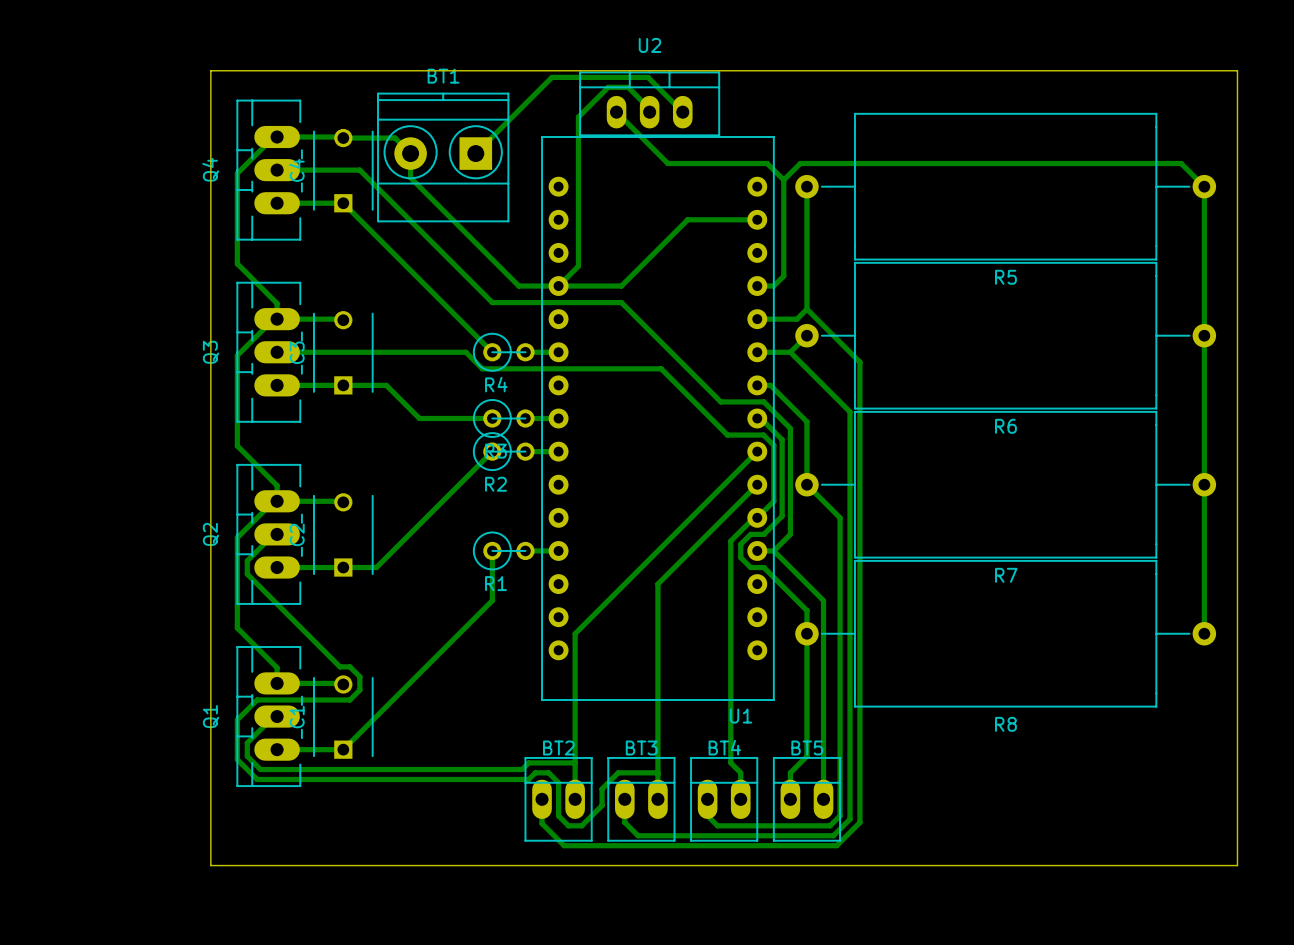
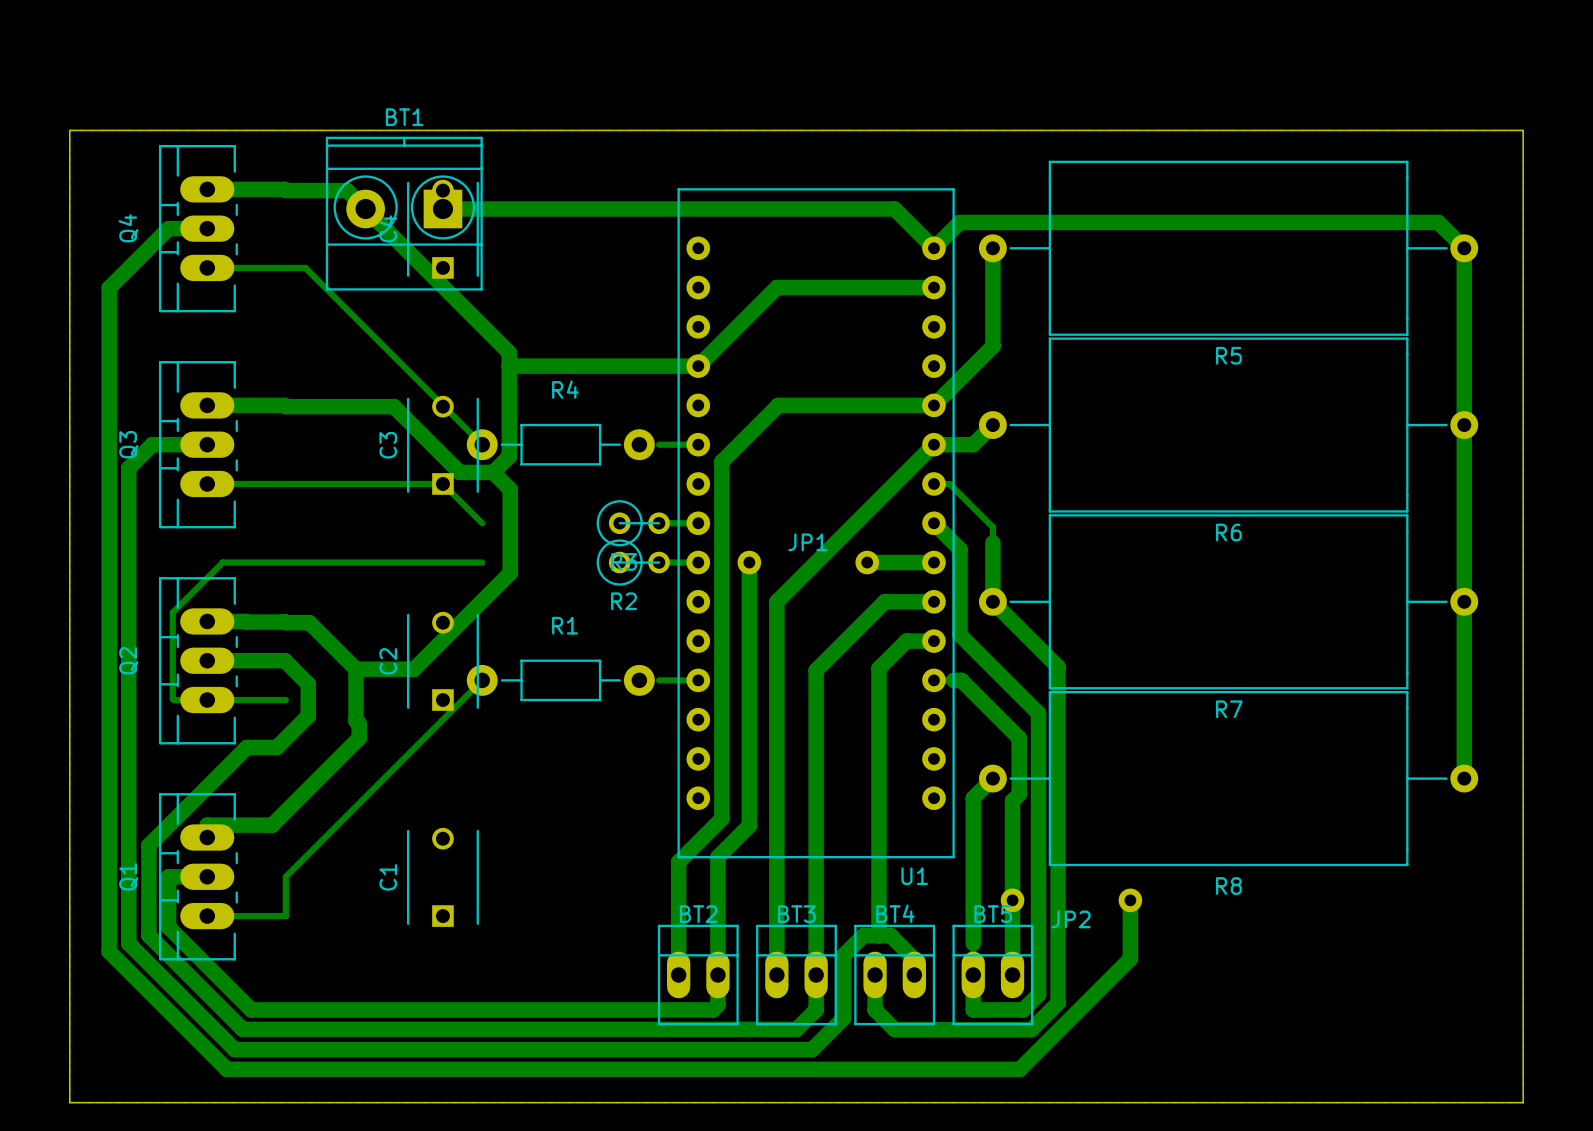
board edge: (210, 70) (210, 865) (1237, 865) (1237, 70) (210, 70) -> (69, 130) (69, 1102) (1523, 1102) (1523, 130) (69, 130)
U2: (649, 103) -> none
bottom track: (616, 112) (667, 163) (767, 163) (783, 180) -> none
bottom track: (649, 112) (649, 108) (628, 87) (608, 87) (578, 117) (578, 266) -> none
bottom track: (682, 112) (647, 77) (551, 77) (475, 153) -> none
bottom track: none -> (207, 189) (347, 190) (509, 352) (509, 456) (493, 472)
BT1 position: (443, 157) -> (404, 213)
bottom track: none -> (207, 228) (168, 228) (109, 288) (109, 951) (226, 1069) (1019, 1069) (1130, 958) (1130, 900)
Q4 position: (269, 170) -> (198, 228)
bottom track: (277, 170) (359, 170) (492, 302) (621, 302) (720, 401) (763, 401) (790, 428) (790, 534) (773, 550) (823, 600) (823, 652) -> (953, 680) (961, 680) (1019, 738) (1019, 794) (1012, 800)
bottom track: (783, 180) (800, 163) (1181, 163) (1204, 186) -> (442, 209) (894, 209) (933, 248) (959, 222) (1438, 222) (1464, 248)
bottom track: (783, 180) (783, 276) (773, 286) (757, 286) -> none
bottom track width: thin (806, 186) (806, 269) -> thick (992, 248) (992, 346)
bottom track width: thin (1204, 186) (1204, 633) -> thick (1464, 248) (1464, 778)
bottom track: none -> (207, 267) (305, 267) (482, 444)
bottom track: (277, 203) (343, 203) (492, 352) -> none
bottom track: (687, 219) (621, 286) (558, 286) -> (851, 287) (776, 287) (721, 342)
bottom track width: thin (687, 219) (757, 219) -> thick (851, 287) (933, 287)
bottom track width: thin (578, 266) (558, 286) (518, 286) -> thick (721, 342) (698, 366) (651, 366)
bottom track: (806, 269) (806, 309) -> none
bottom track: (518, 286) (410, 177) (410, 153) (395, 138) (273, 137) (237, 173) (237, 263) (277, 303) (277, 319) -> (651, 366) (509, 366)
bottom track: (806, 309) (859, 362) (859, 822) (836, 845) (564, 845) (542, 823) (542, 799) -> (992, 346) (933, 405) (778, 405) (721, 461) (721, 818) (678, 861) (678, 974)
bottom track: (806, 309) (797, 319) (757, 319) -> none
bottom track: none -> (207, 405) (393, 406) (459, 472) (493, 472)
bottom track: (343, 320) (273, 319) (237, 355) (237, 445) (277, 485) (277, 501) -> none
R4 footprint: [472, 332, 535, 372] -> [466, 423, 655, 466]
bottom track width: thin (806, 335) (790, 352) (757, 352) -> thick (992, 425) (973, 444) (933, 444)
bottom track: none -> (207, 444) (152, 444) (128, 468) (128, 943) (234, 1049) (812, 1049) (843, 1018) (843, 955) (863, 935) (890, 935) (914, 959)
Q3 position: (269, 352) -> (198, 444)
bottom track: (277, 352) (465, 352) (482, 368) (661, 368) (727, 435) (763, 435) (773, 445) (773, 501) (757, 517) -> none
bottom track: (790, 352) (850, 411) (850, 819) (833, 835) (638, 835) (624, 822) (624, 799) -> (933, 444) (776, 601) (776, 974)
bottom track: none -> (493, 472) (510, 489) (510, 573) (414, 669) (355, 669)
R4 name position: R4 (496, 384) -> R4 (565, 389)
bottom track: none -> (207, 483) (364, 483)
bottom track: (343, 385) (386, 385) (419, 418) (492, 418) -> (442, 483) (482, 523)
bottom track: (758, 416) (782, 439) (782, 516) (763, 534) (750, 534) (740, 544) (740, 557) (750, 567) (763, 567) (806, 610) (806, 756) (790, 772) -> (992, 778) (973, 798) (973, 943)
bottom track: none -> (933, 523) (960, 549) (960, 634) (1038, 713) (1038, 994) (1023, 1009) (973, 1009) (973, 974)
bottom track width: thin (806, 435) (806, 484) (840, 517) -> thick (992, 542) (992, 601) (1032, 641)
bottom track: none -> (482, 562) (222, 562) (172, 612) (172, 698) (285, 700)
bottom track: (492, 451) (376, 567) (277, 567) -> none
JP1: none -> (808, 562)
bottom track: none -> (867, 562) (933, 562)
bottom track: (757, 451) (575, 633) (575, 699) -> (749, 562) (749, 825) (717, 857)
bottom track: (757, 484) (657, 584) -> (933, 601) (884, 601) (816, 670) (816, 719)
bottom track: none -> (207, 621) (285, 622)
bottom track: none -> (284, 621) (309, 622) (355, 669)
bottom track: (343, 502) (273, 501) (237, 537) (237, 628) (277, 667) (277, 683) (343, 684) -> none
bottom track: (753, 517) (730, 541) (730, 762) (740, 772) (740, 786) -> (930, 641) (906, 641) (878, 668) (878, 935)
bottom track: (840, 517) (840, 815) (830, 825) (717, 825) (704, 812) -> (1032, 641) (1058, 666) (1058, 1002) (1031, 1029) (894, 1029) (875, 1009) (875, 974)
R1 footprint: [472, 531, 535, 571] -> [466, 659, 655, 702]
bottom track: (274, 533) (247, 560) (247, 574) (340, 666) (349, 666) (359, 676) (359, 690) (349, 699) (257, 699) (237, 719) (237, 759) (257, 779) (528, 779) (535, 772) (548, 772) (558, 782) (558, 815) (568, 825) (581, 825) (602, 805) (602, 788) (618, 772) (657, 772) -> none
bottom track: none -> (207, 660) (284, 660) (308, 684) (308, 716) (276, 747) (246, 747) (148, 845) (148, 935) (242, 1029) (796, 1029) (816, 1009) (816, 974)
Q2 position: (269, 534) -> (198, 660)
bottom track: none -> (355, 669) (355, 720) (359, 724) (359, 738) (272, 825) (207, 825) (207, 837)
bottom track: none -> (482, 680) (285, 876) (285, 916) (207, 916)
bottom track: (492, 550) (492, 600) (343, 749) (277, 749) -> none
R1 name position: R1 (495, 583) -> R1 (565, 625)
bottom track width: thin (657, 584) (657, 799) -> thick (816, 719) (816, 974)
bottom track width: thin (823, 652) (823, 799) -> thick (1012, 800) (1012, 974)
bottom track width: thin (575, 699) (575, 799) -> thick (717, 857) (717, 974)
bottom track: none -> (207, 876) (168, 876) (168, 927) (251, 1009) (713, 1009) (717, 1005) (717, 974)
Q1 position: (269, 716) -> (198, 876)
bottom track: (277, 716) (273, 716) (247, 743) (247, 756) (260, 769) (522, 769) (528, 762) (575, 762) -> none
JP2: none -> (1071, 900)

